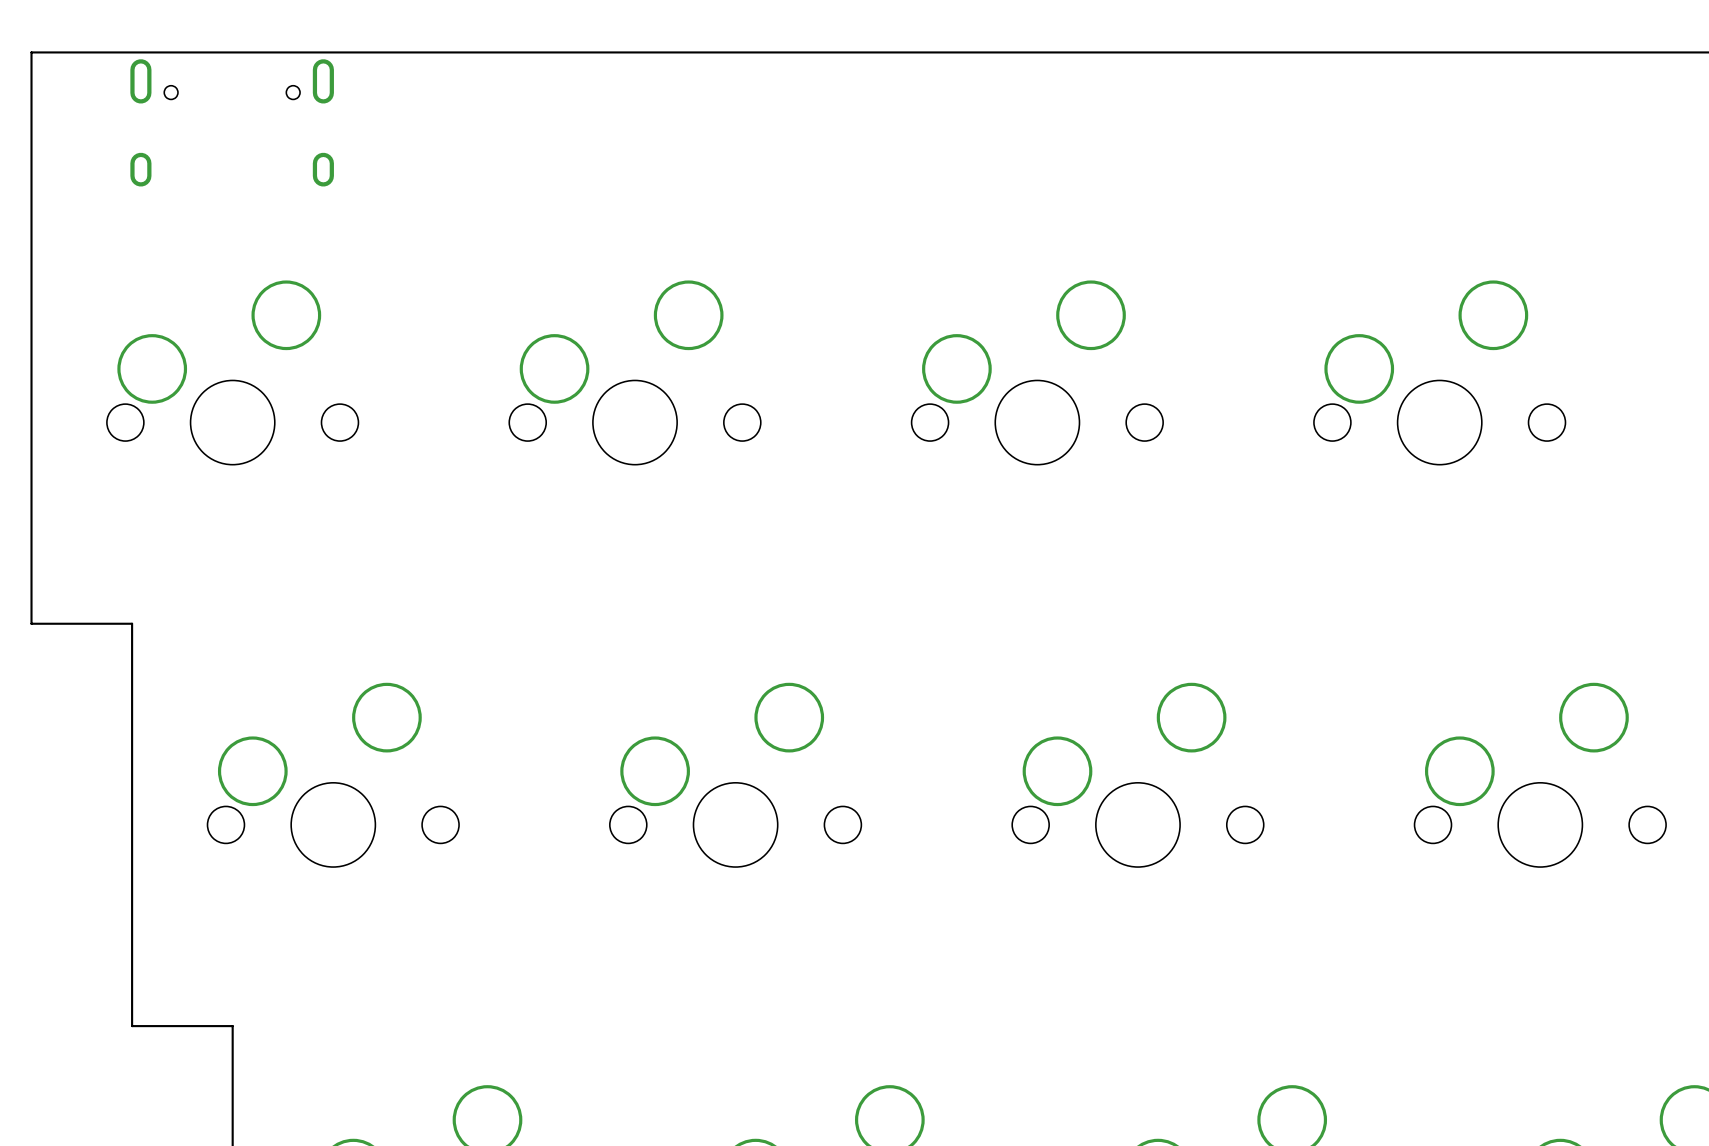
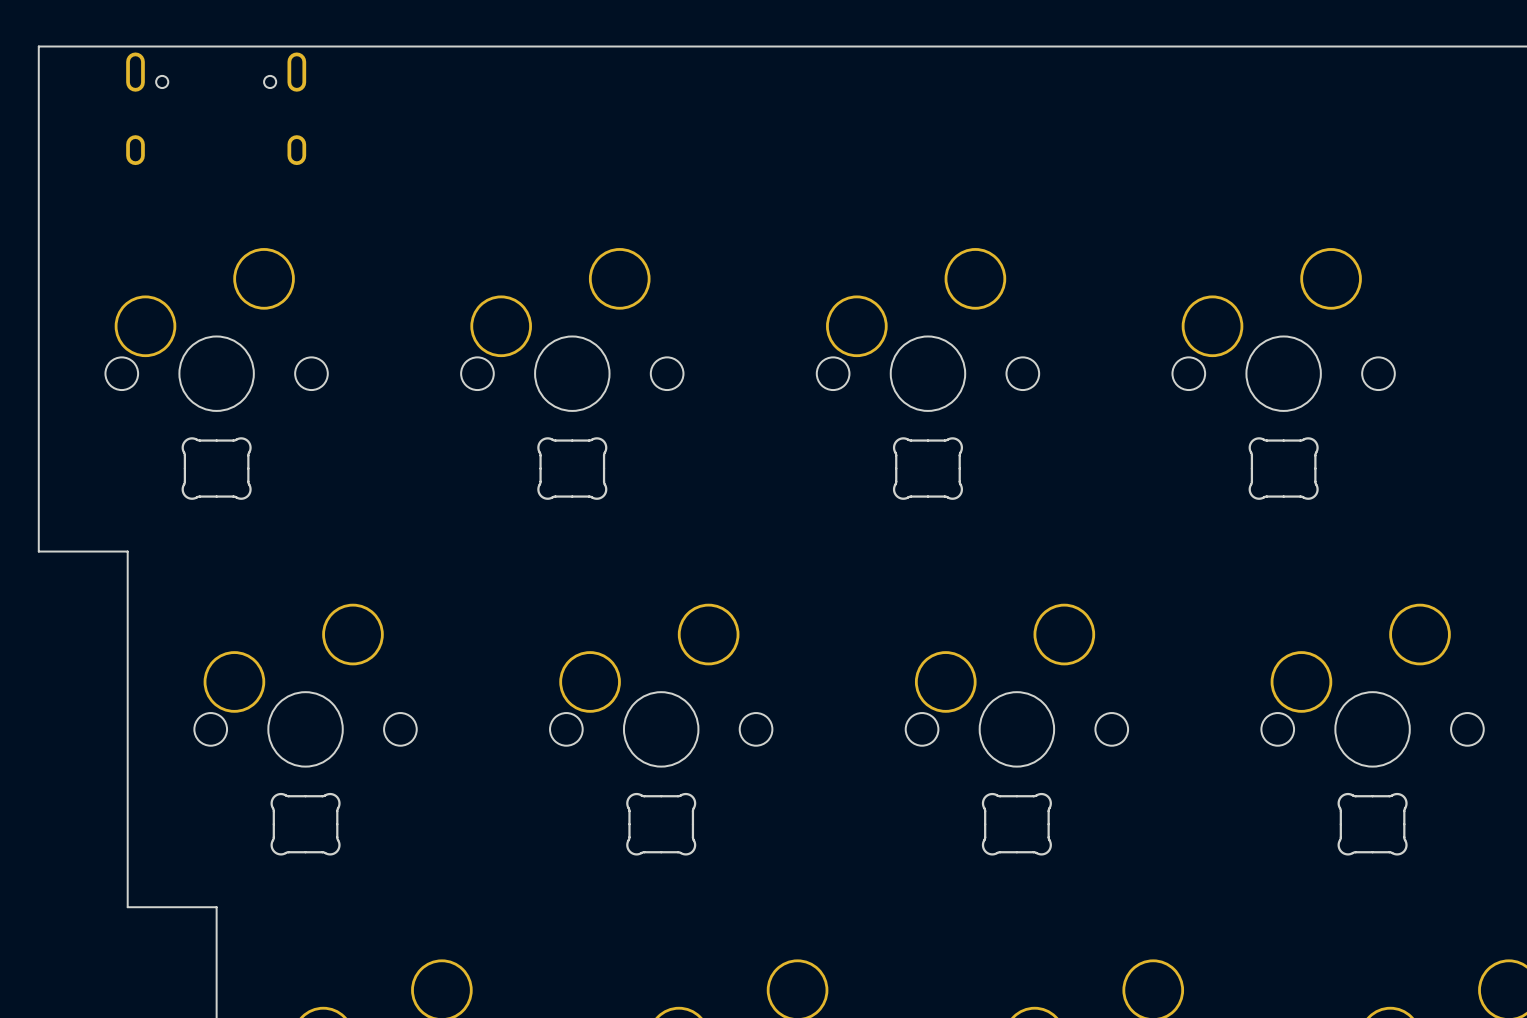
part: none -> (216, 468)
part: none -> (572, 468)
part: none -> (927, 468)
part: none -> (1283, 468)
part: none -> (305, 824)
part: none -> (661, 824)
part: none -> (1016, 824)
part: none -> (1372, 824)

